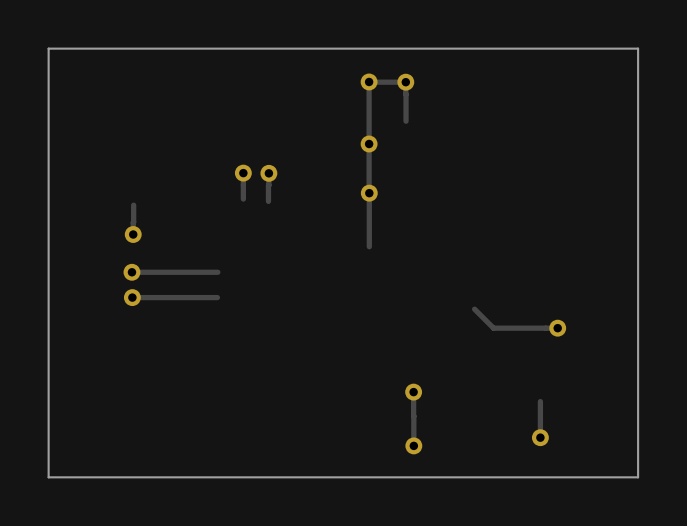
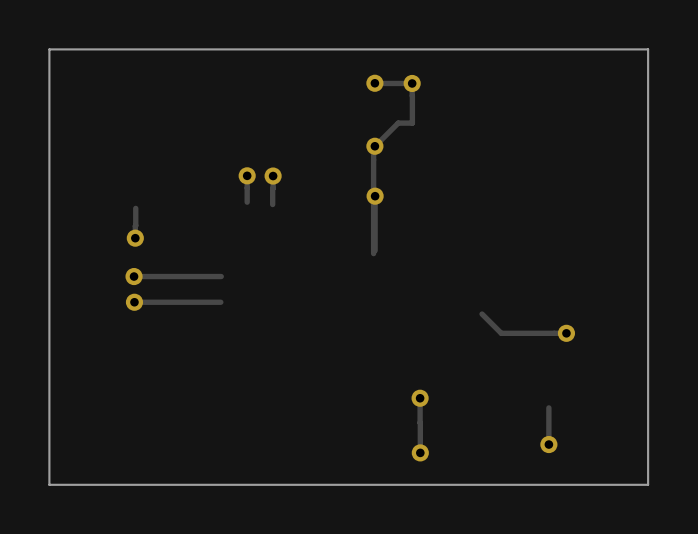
track: (369, 81) (369, 192) -> none
track: none -> (412, 123) (398, 123) (373, 147) (373, 253)

